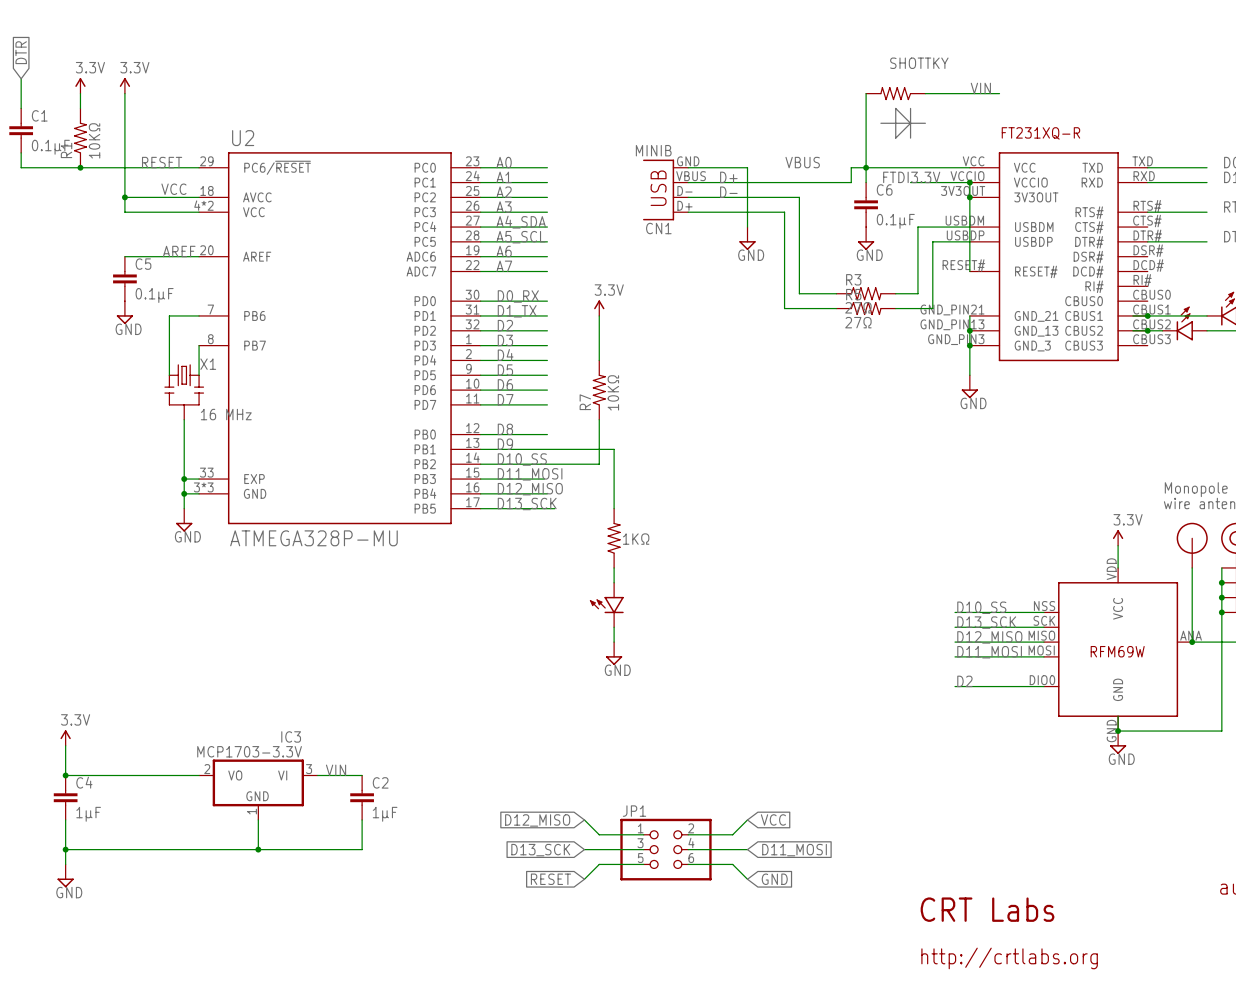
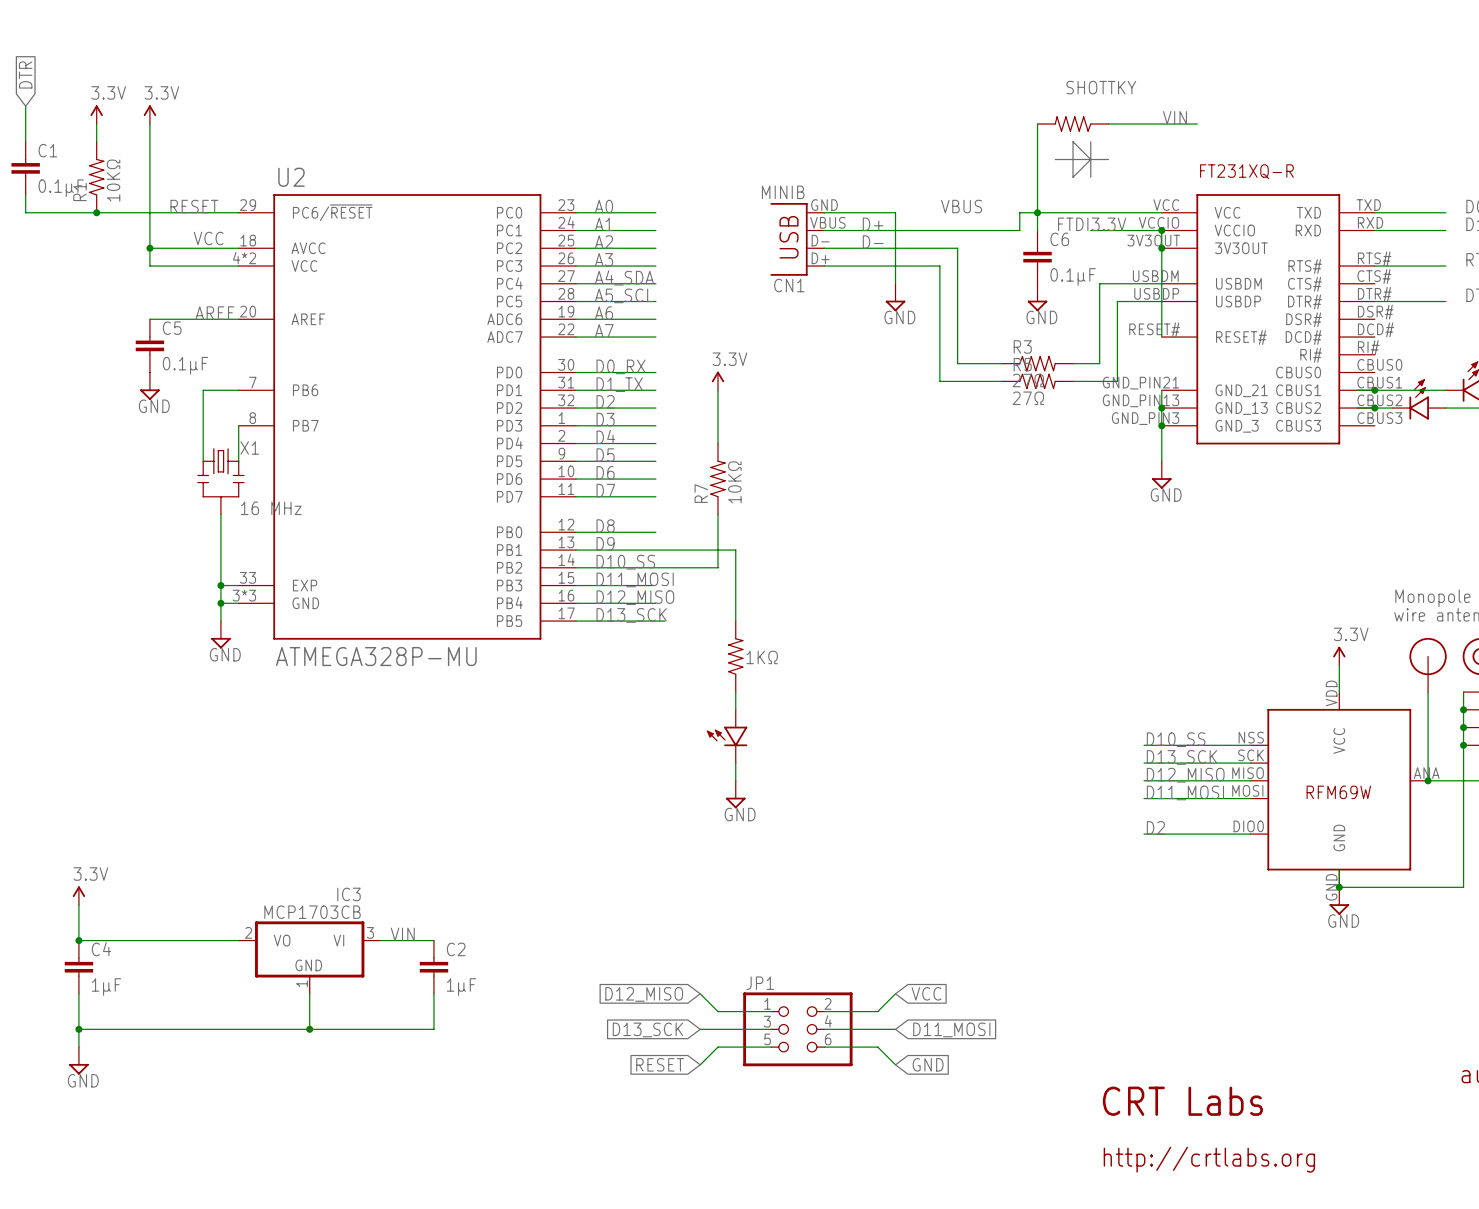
IC3 value: MCP1703-3.3V (249, 751) -> MCP1703CB (312, 912)

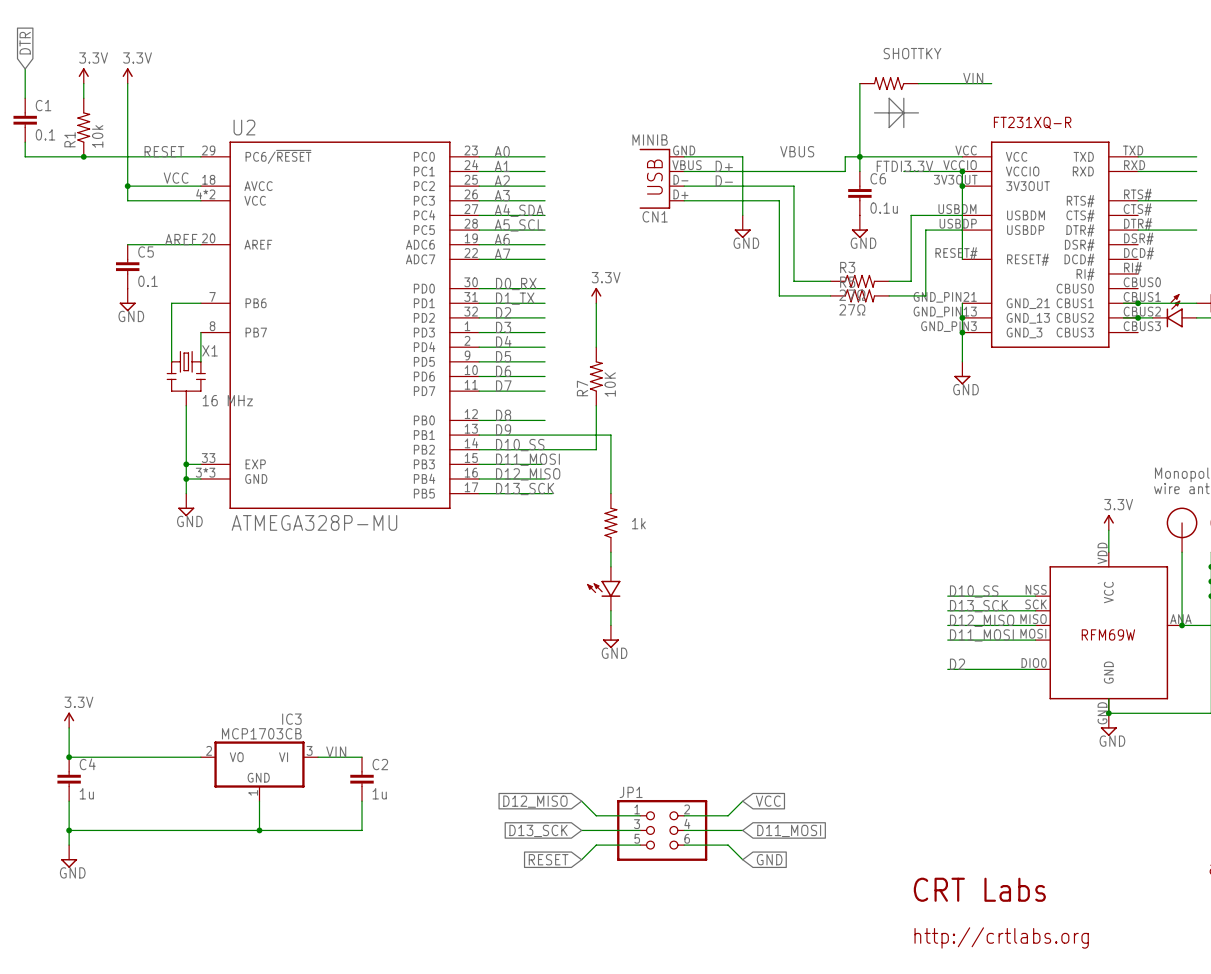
R1 value: 10KΩ (113, 180) -> 10k (97, 136)
C1 value: 0.1μF (61, 188) -> 0.1 (45, 134)
C6 value: 0.1μF (1073, 276) -> 0.1u (884, 208)
C5 value: 0.1μF (185, 365) -> 0.1 (148, 281)
R7 value: 10KΩ (734, 482) -> 10K (610, 384)
part value: 1KΩ (762, 657) -> 1k (638, 523)
C4 value: 1μF (106, 987) -> 1u (86, 793)
C2 value: 1μF (461, 987) -> 1u (379, 793)

